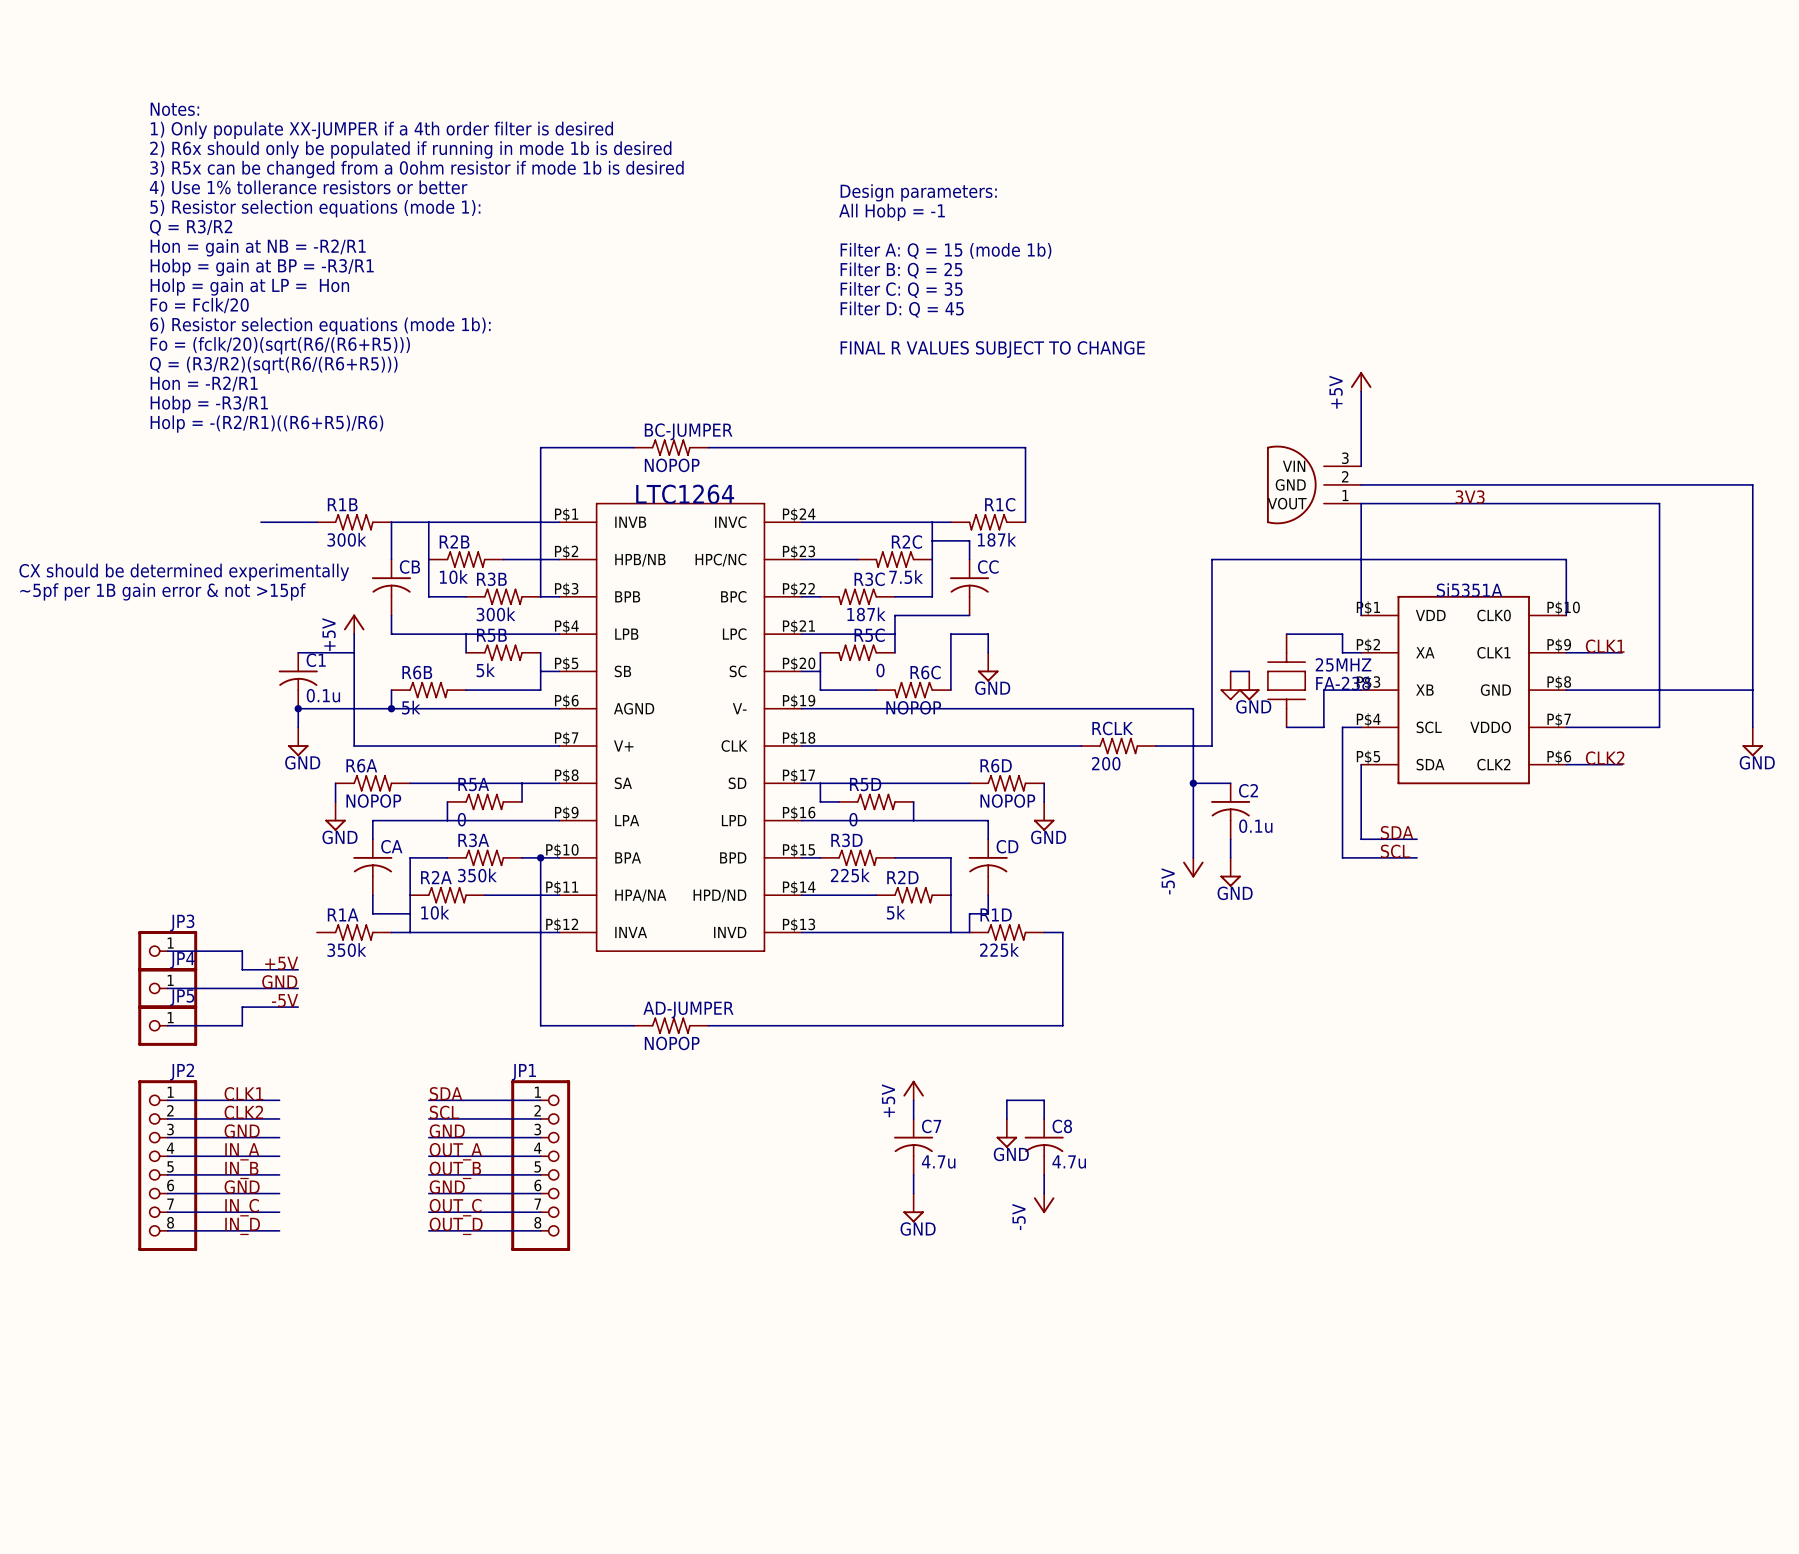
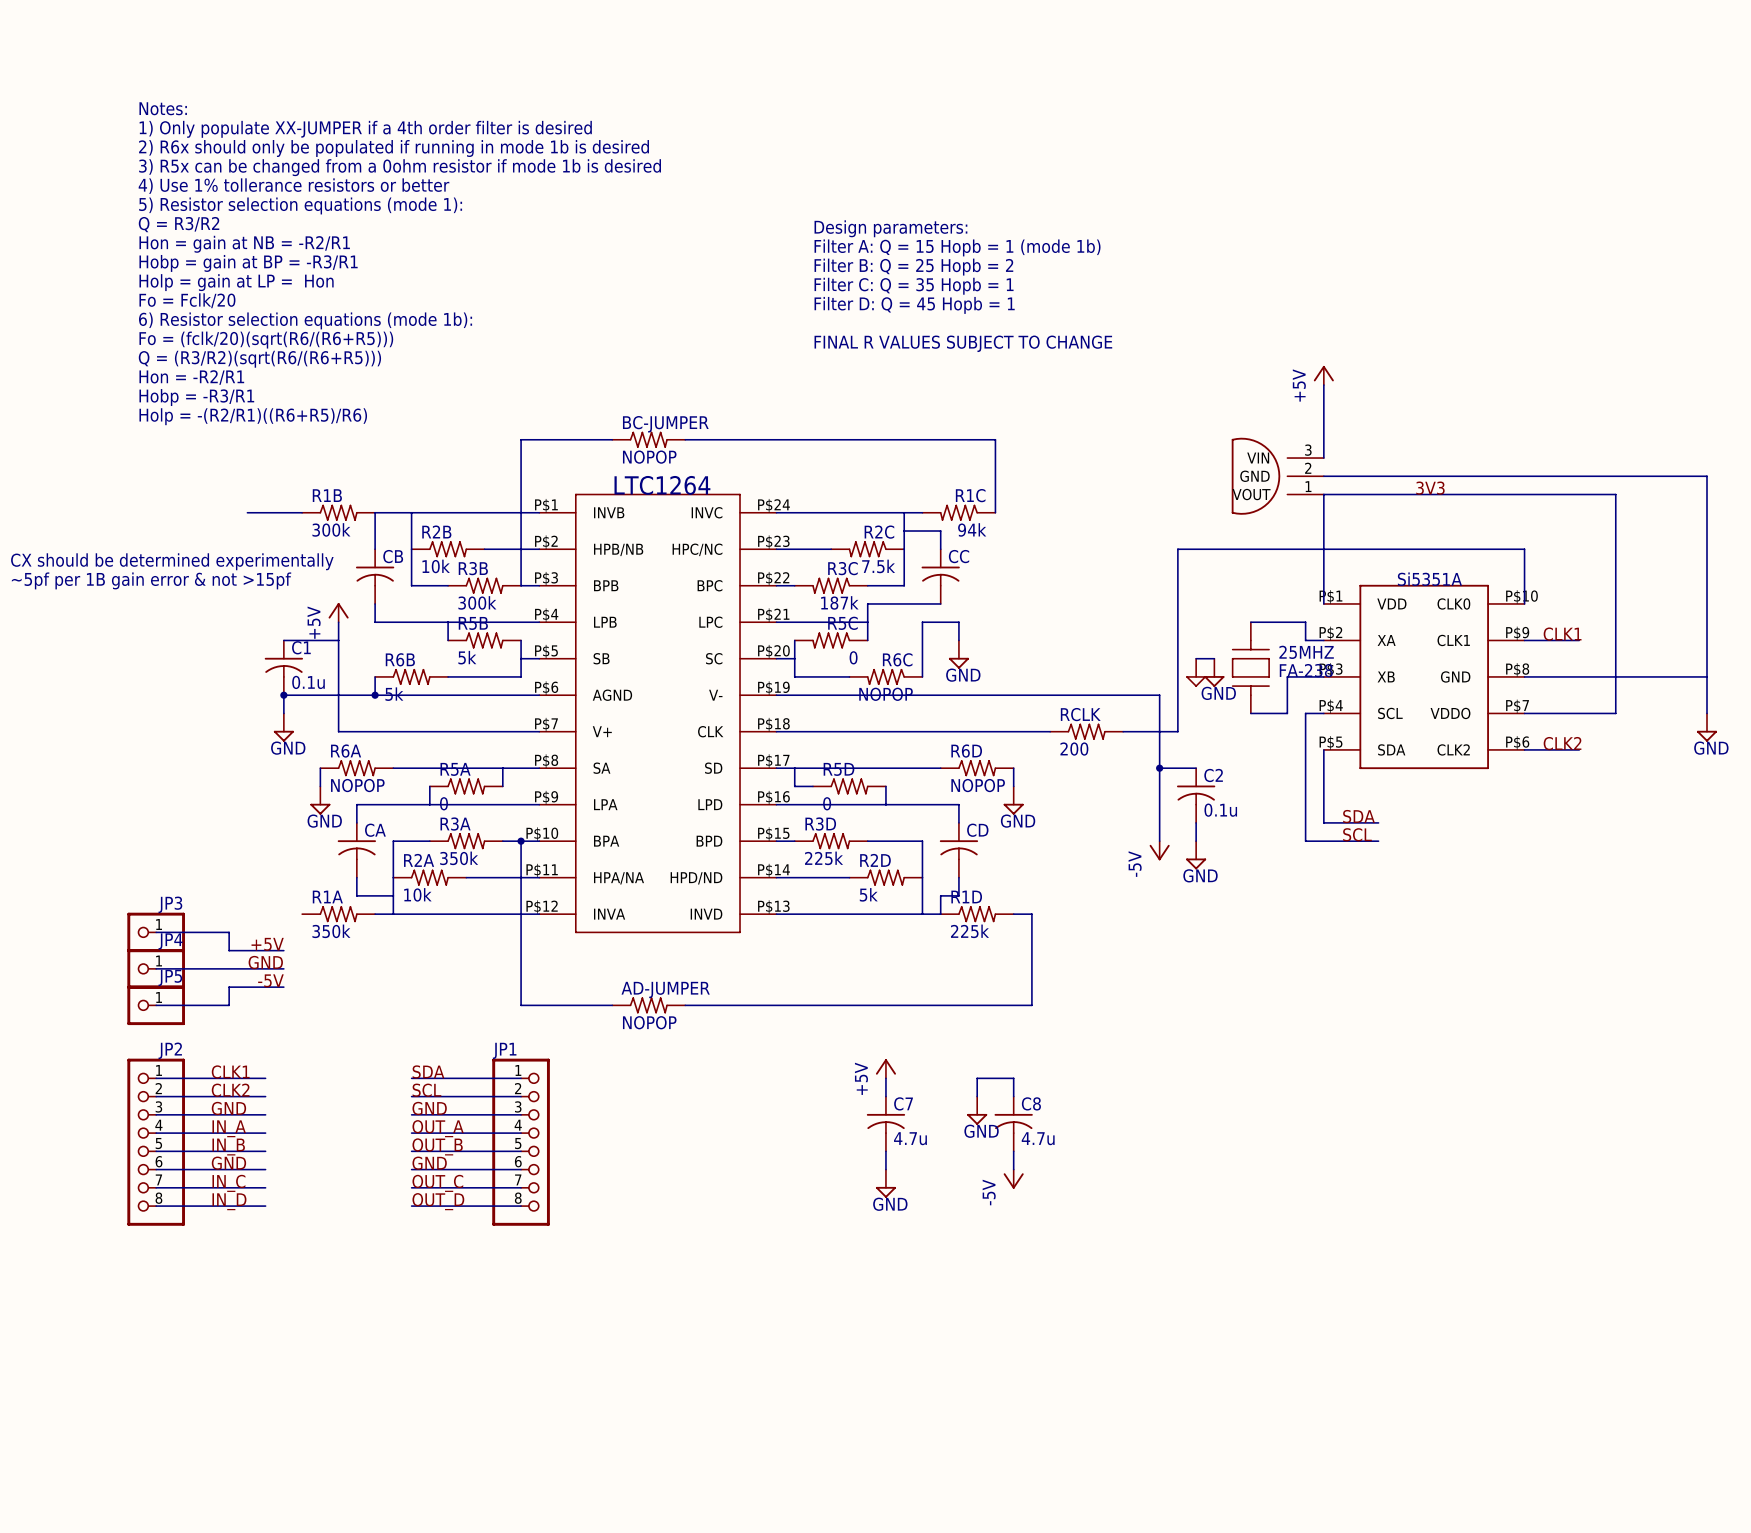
text position: Design parameters: (918, 192) -> Design parameters: (890, 228)
text: All Hobp = -1 (892, 212) -> none
text: Filter A: Q = 15 (mode 1b) (945, 250) -> Filter A: Q = 15 Hopb = 1 (mode 1b) (957, 247)
text: Filter B: Q = 25 (901, 270) -> Filter B: Q = 25 Hopb = 2 (913, 267)
text: Filter C: Q = 35 (901, 290) -> Filter C: Q = 35 Hopb = 1 (914, 286)
text: Filter D: Q = 45 (902, 309) -> Filter D: Q = 45 Hopb = 1 (914, 305)
R1C value: 187k (997, 539) -> 94k (972, 529)

